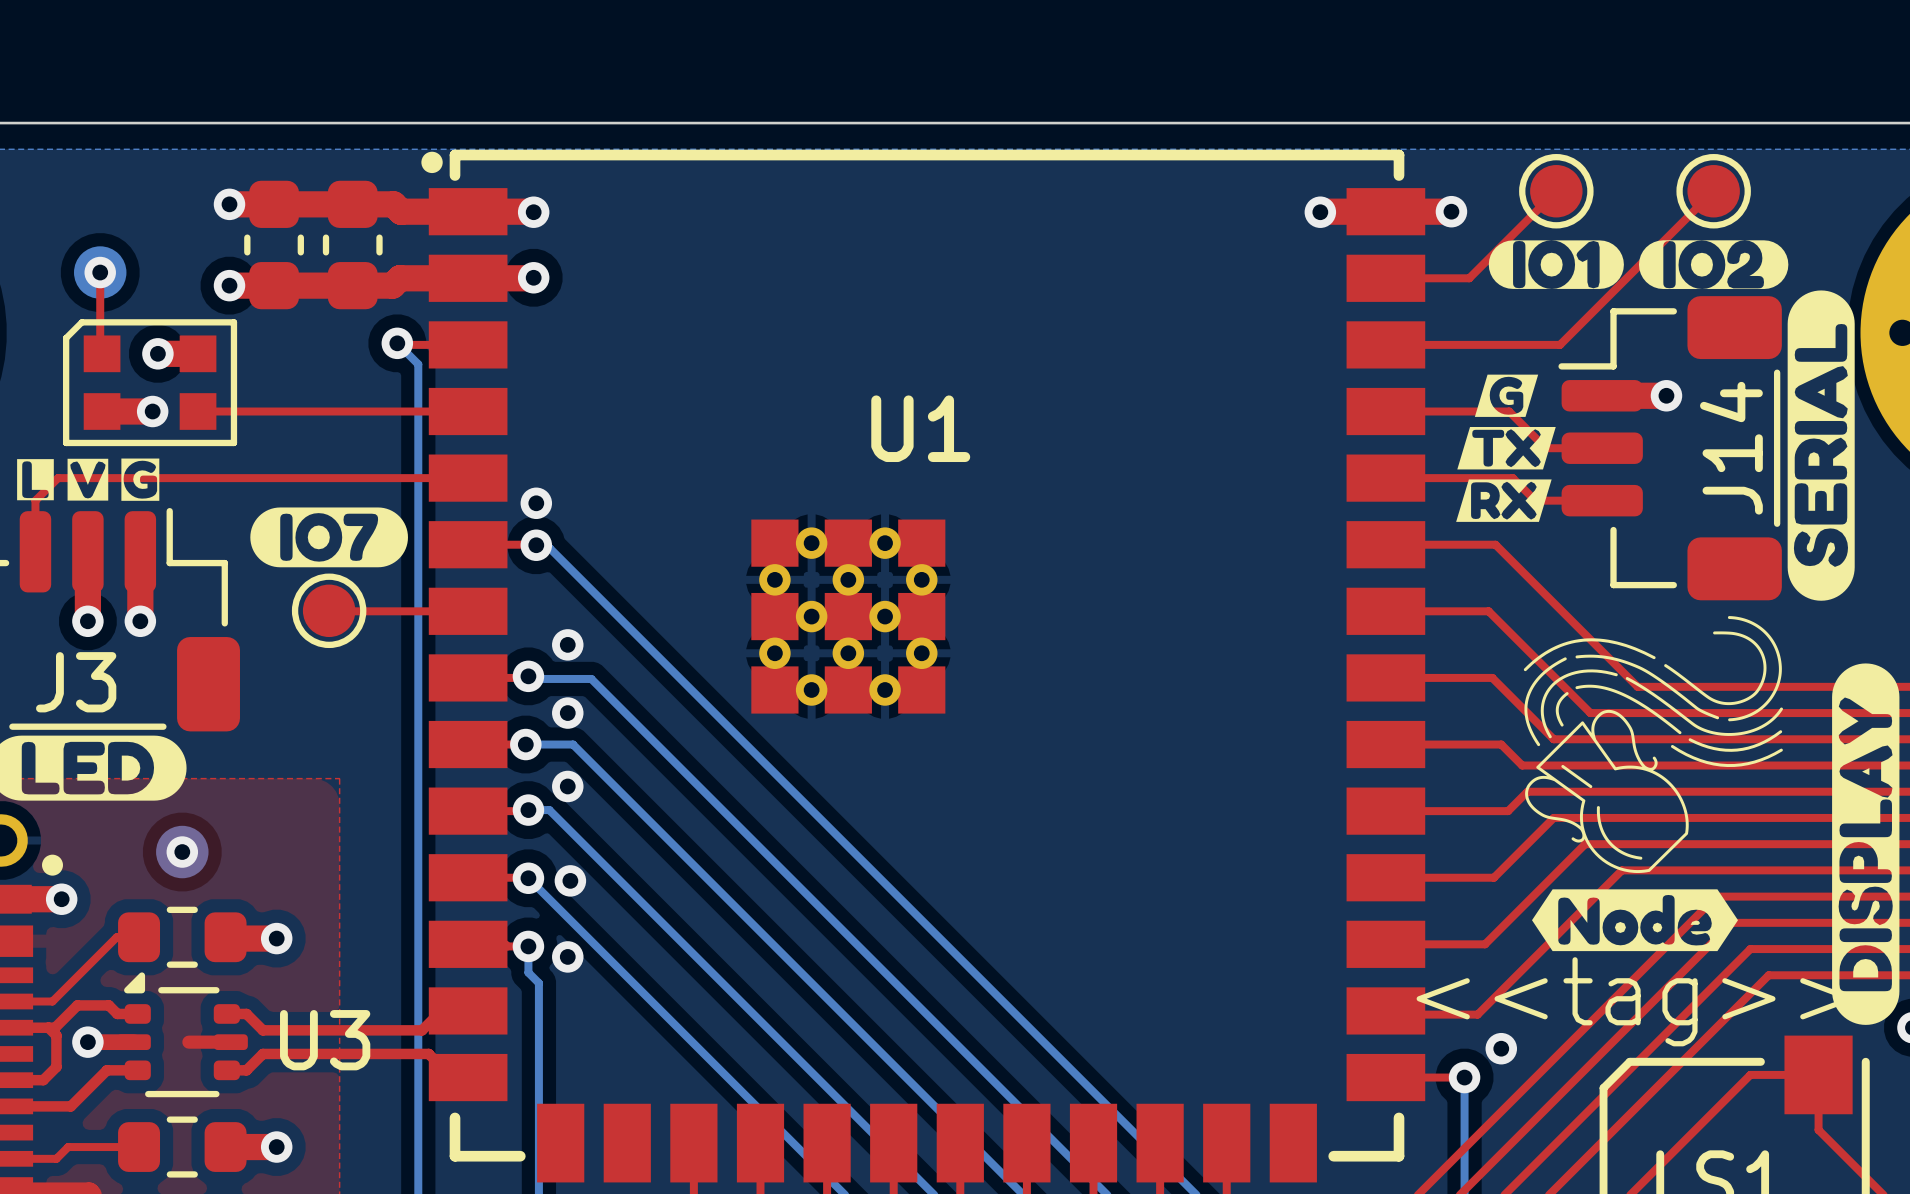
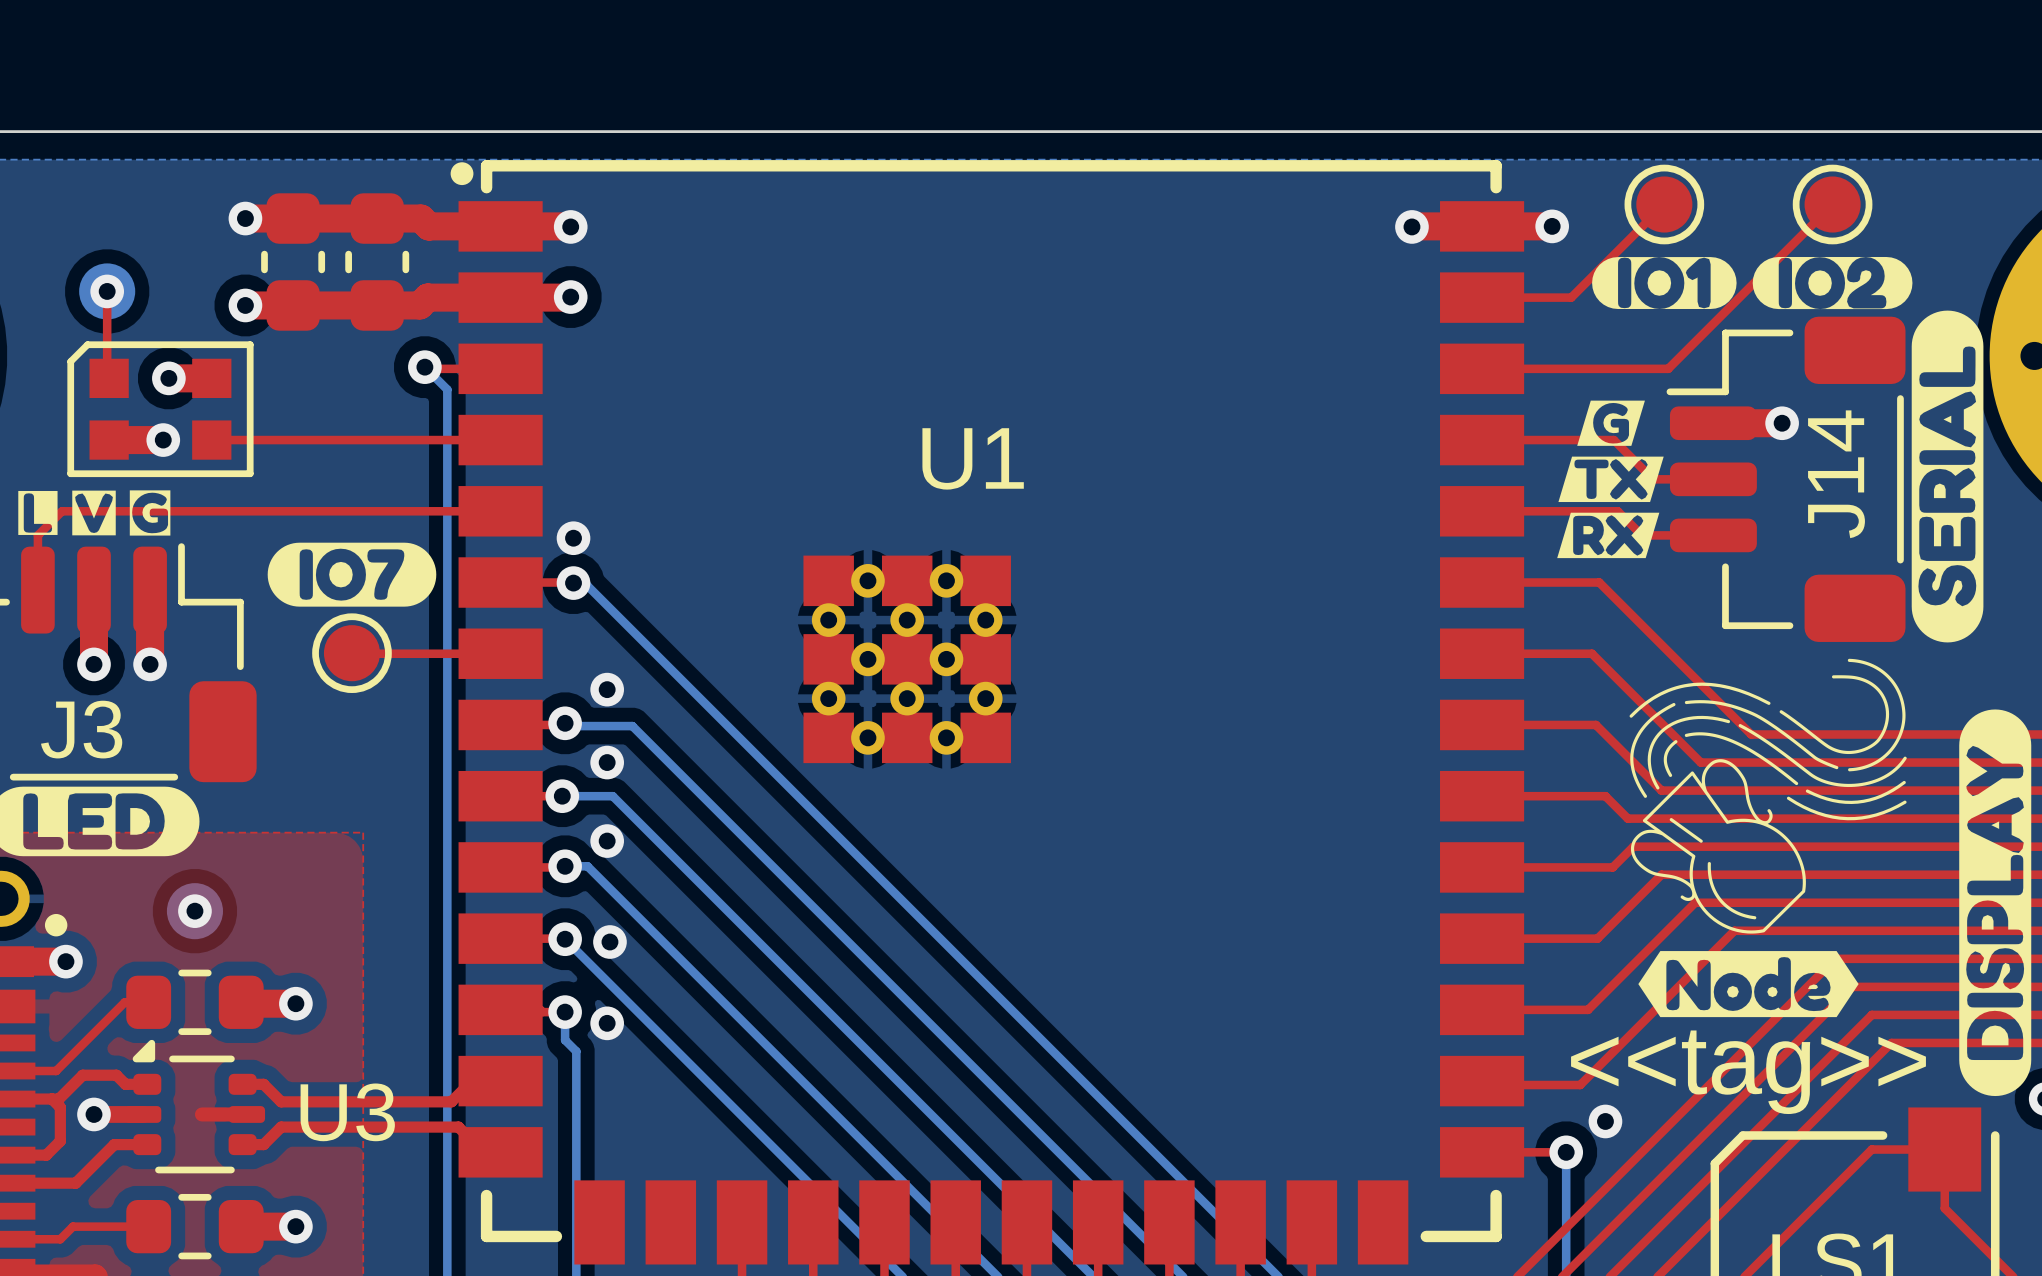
J14 name position: J14 (1731, 448) -> J14 (1836, 474)

